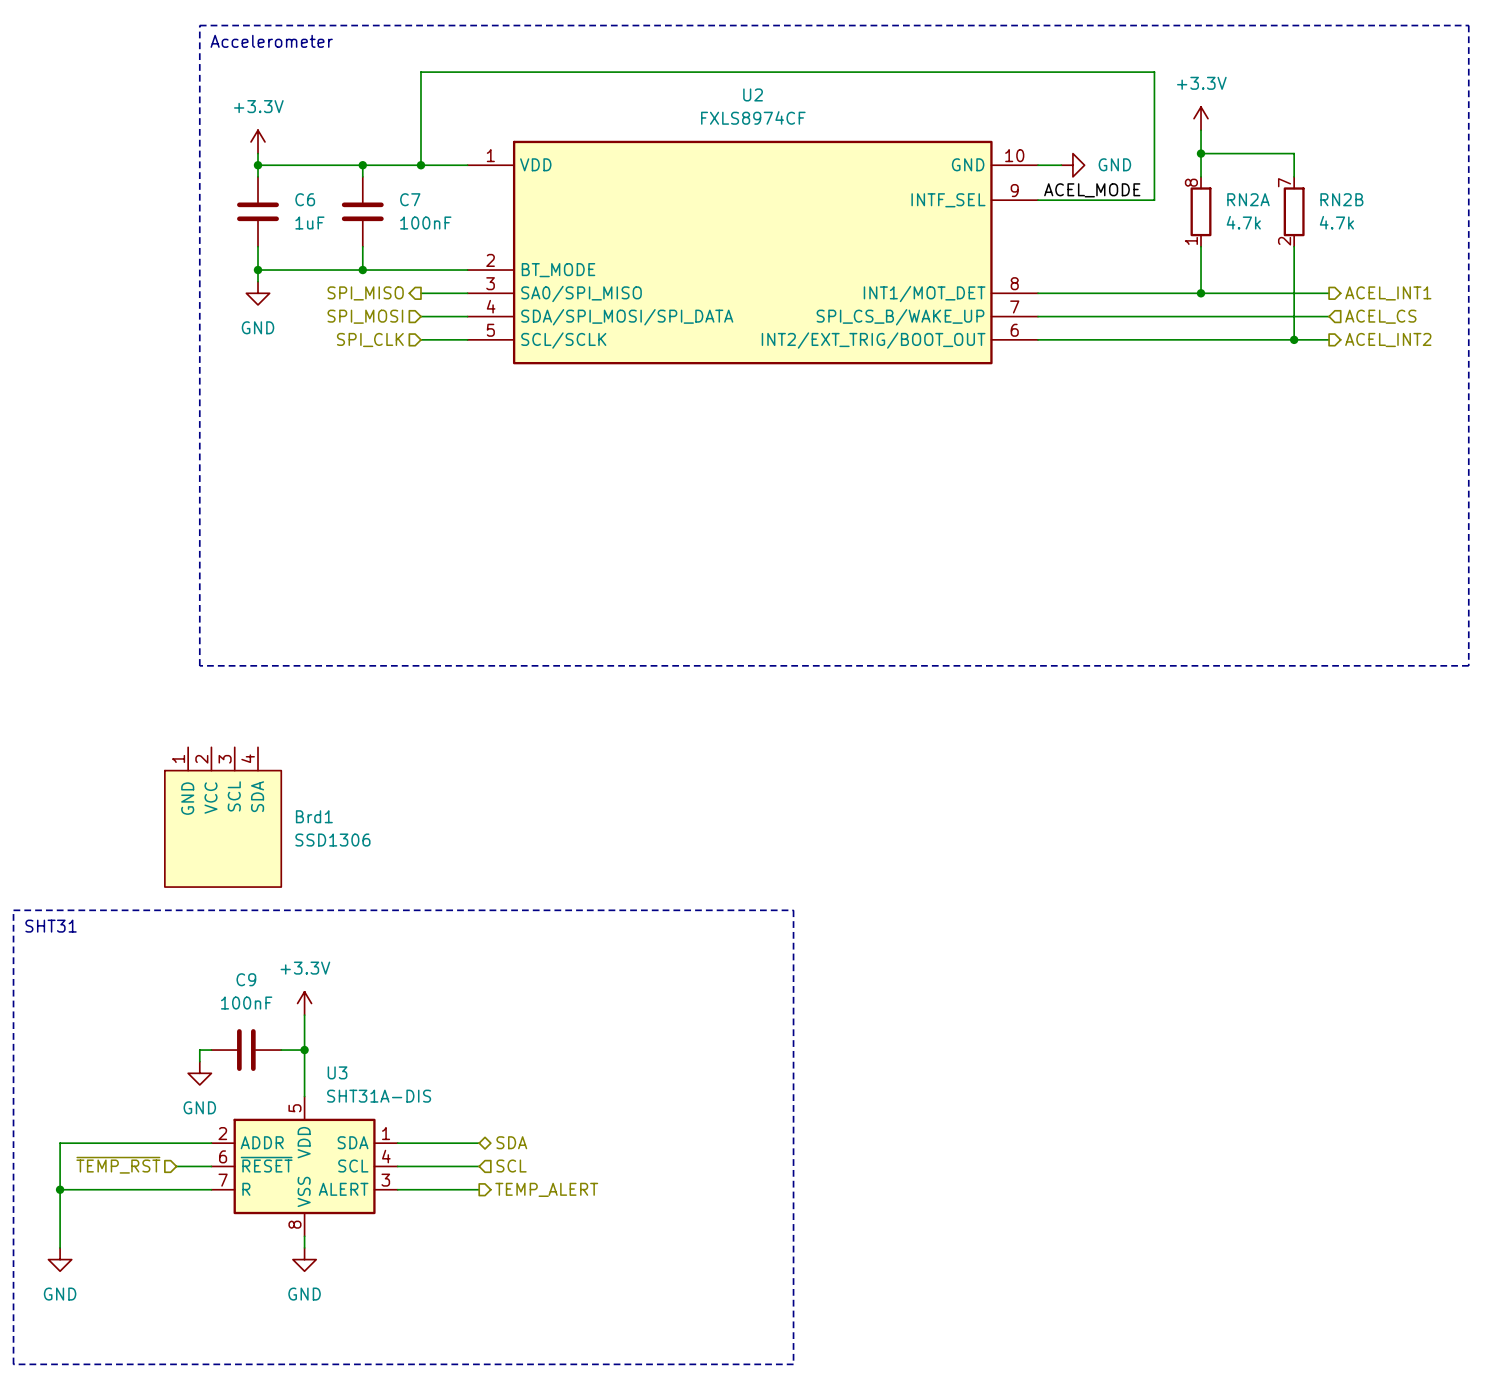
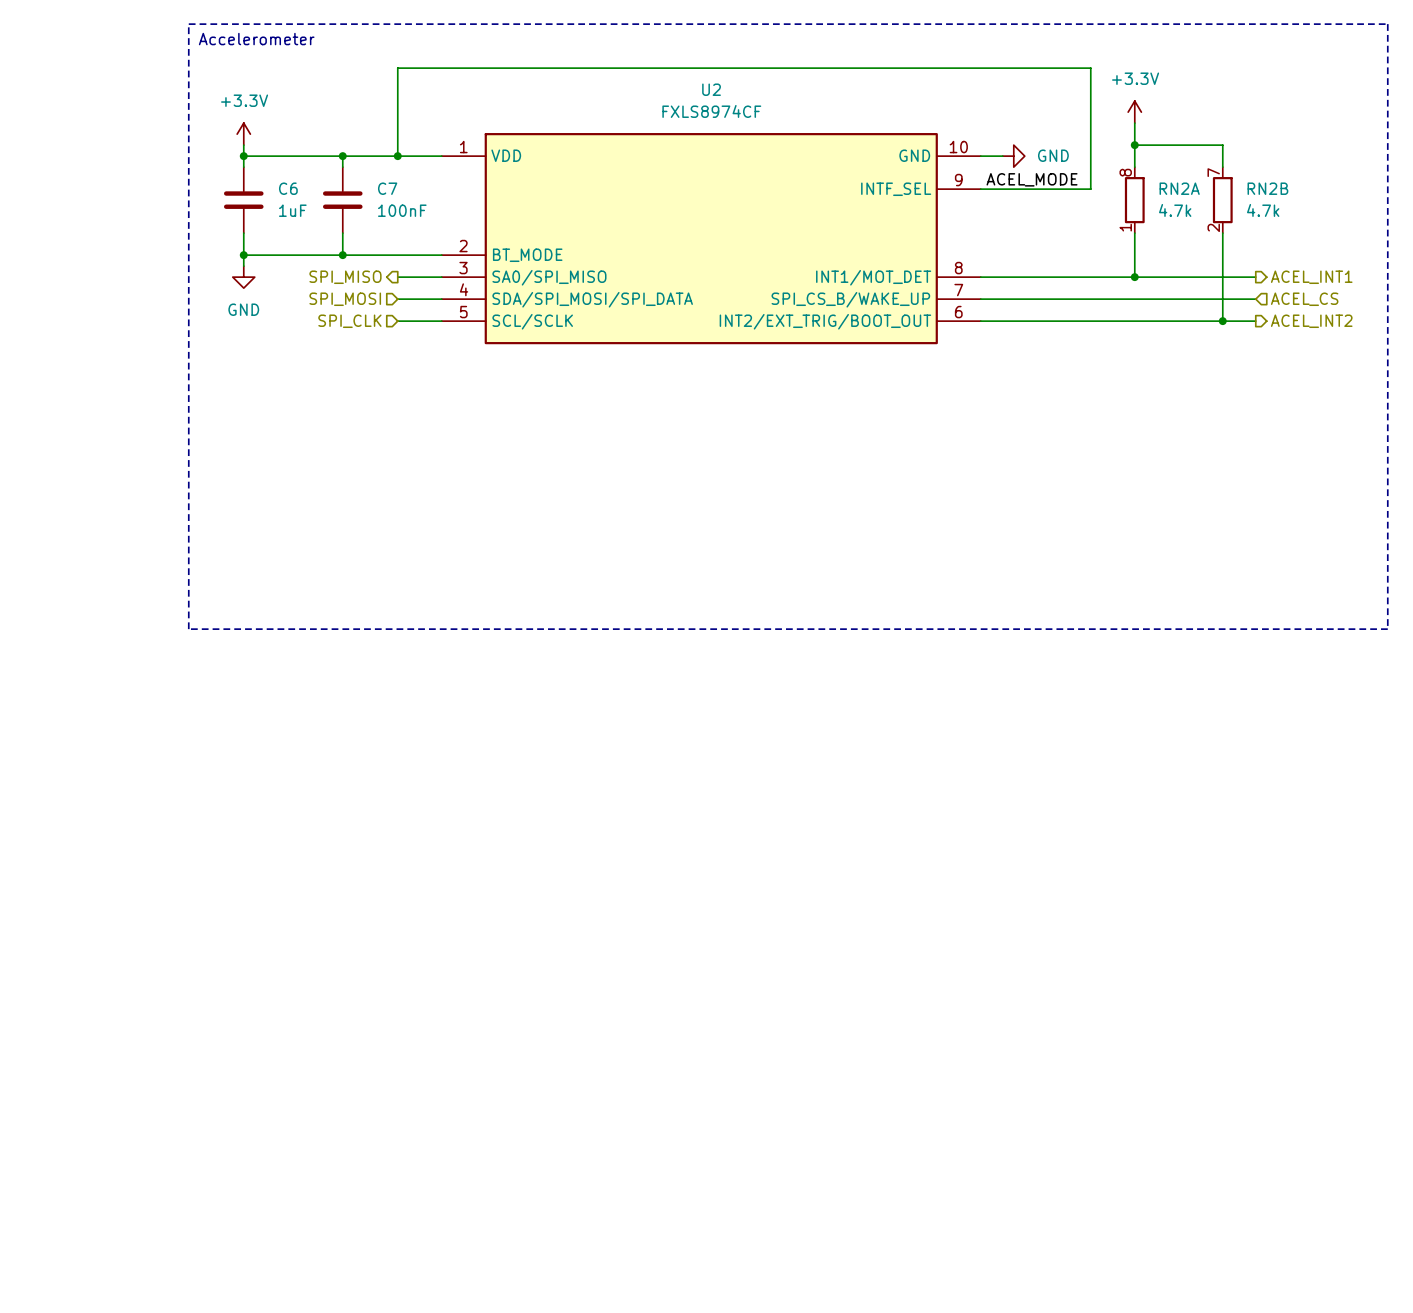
Brd1: SSD1306 (223, 817) -> none
line: (13, 910) (793, 910) (793, 1364) (13, 1364) (13, 910) -> none
text: SHT31 (51, 926) -> none
power symbol: +3.3V (304, 1003) -> none
wire: (304, 1015) (304, 1096) -> none
wire: (211, 1050) (199, 1050) (199, 1061) -> none
C9: 100nF (246, 1050) -> none
wire: (281, 1050) (304, 1050) -> none
junction: (304, 1050) -> none
power symbol: GND (199, 1073) -> none
hierarchical label: SDA (511, 1142) -> none
wire: (211, 1143) (60, 1143) (60, 1247) -> none
wire: (397, 1143) (479, 1143) -> none
hierarchical label: ~{TEMP_RST} (118, 1165) -> none
wire: (176, 1166) (211, 1166) -> none
U3: SHT31A-DIS (304, 1166) -> none
wire: (397, 1166) (479, 1166) -> none
hierarchical label: SCL (511, 1166) -> none
wire: (60, 1189) (211, 1189) -> none
junction: (60, 1189) -> none
wire: (397, 1189) (479, 1189) -> none
hierarchical label: TEMP_ALERT (546, 1189) -> none
wire: (304, 1236) (304, 1247) -> none
power symbol: GND (60, 1259) -> none
power symbol: GND (304, 1259) -> none

